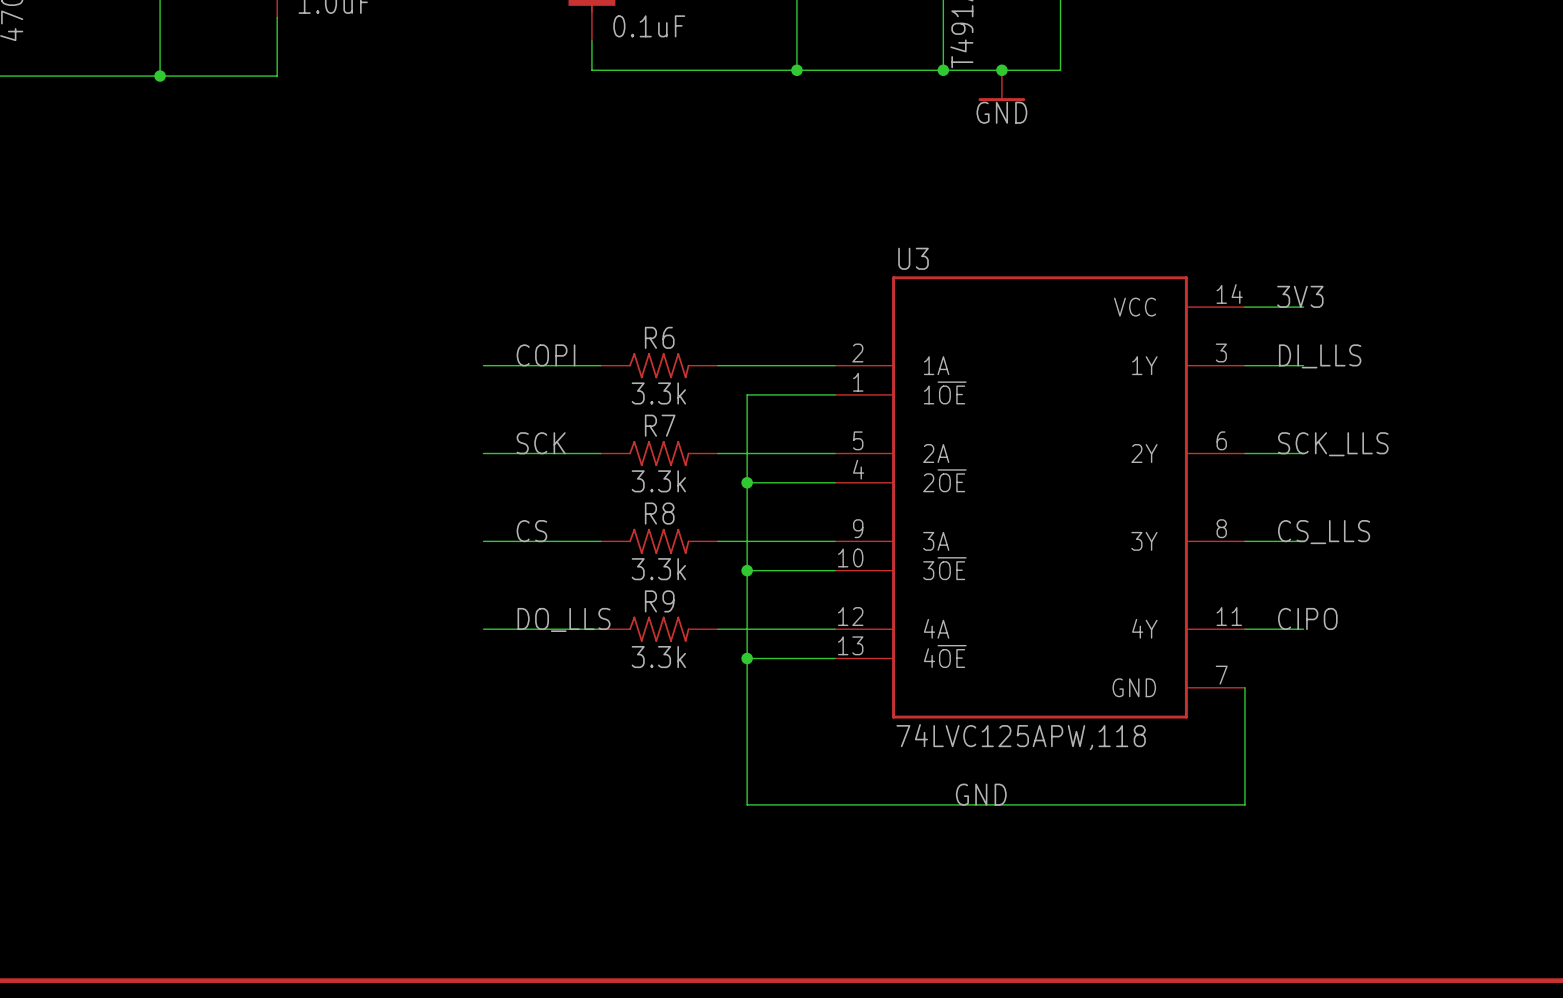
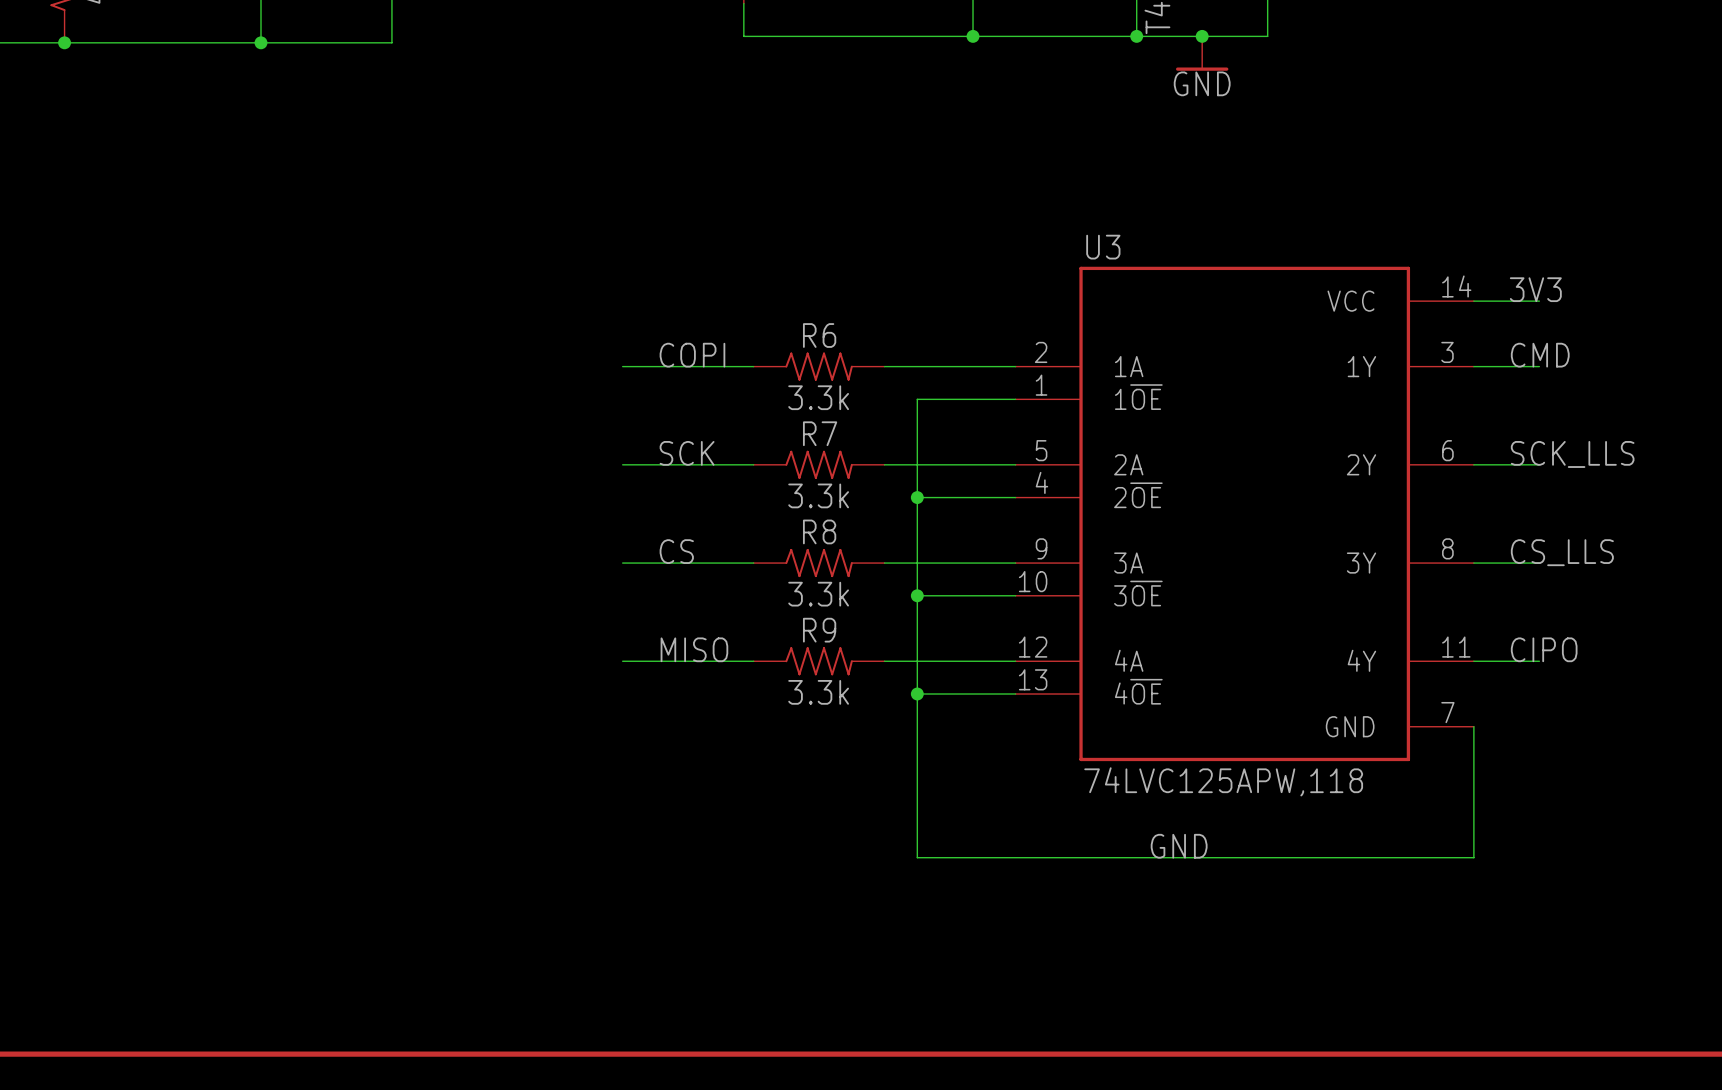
label: DI_LLS (1320, 356) -> CMD (1540, 355)
label: DO_LLS (564, 619) -> MISO (694, 649)

